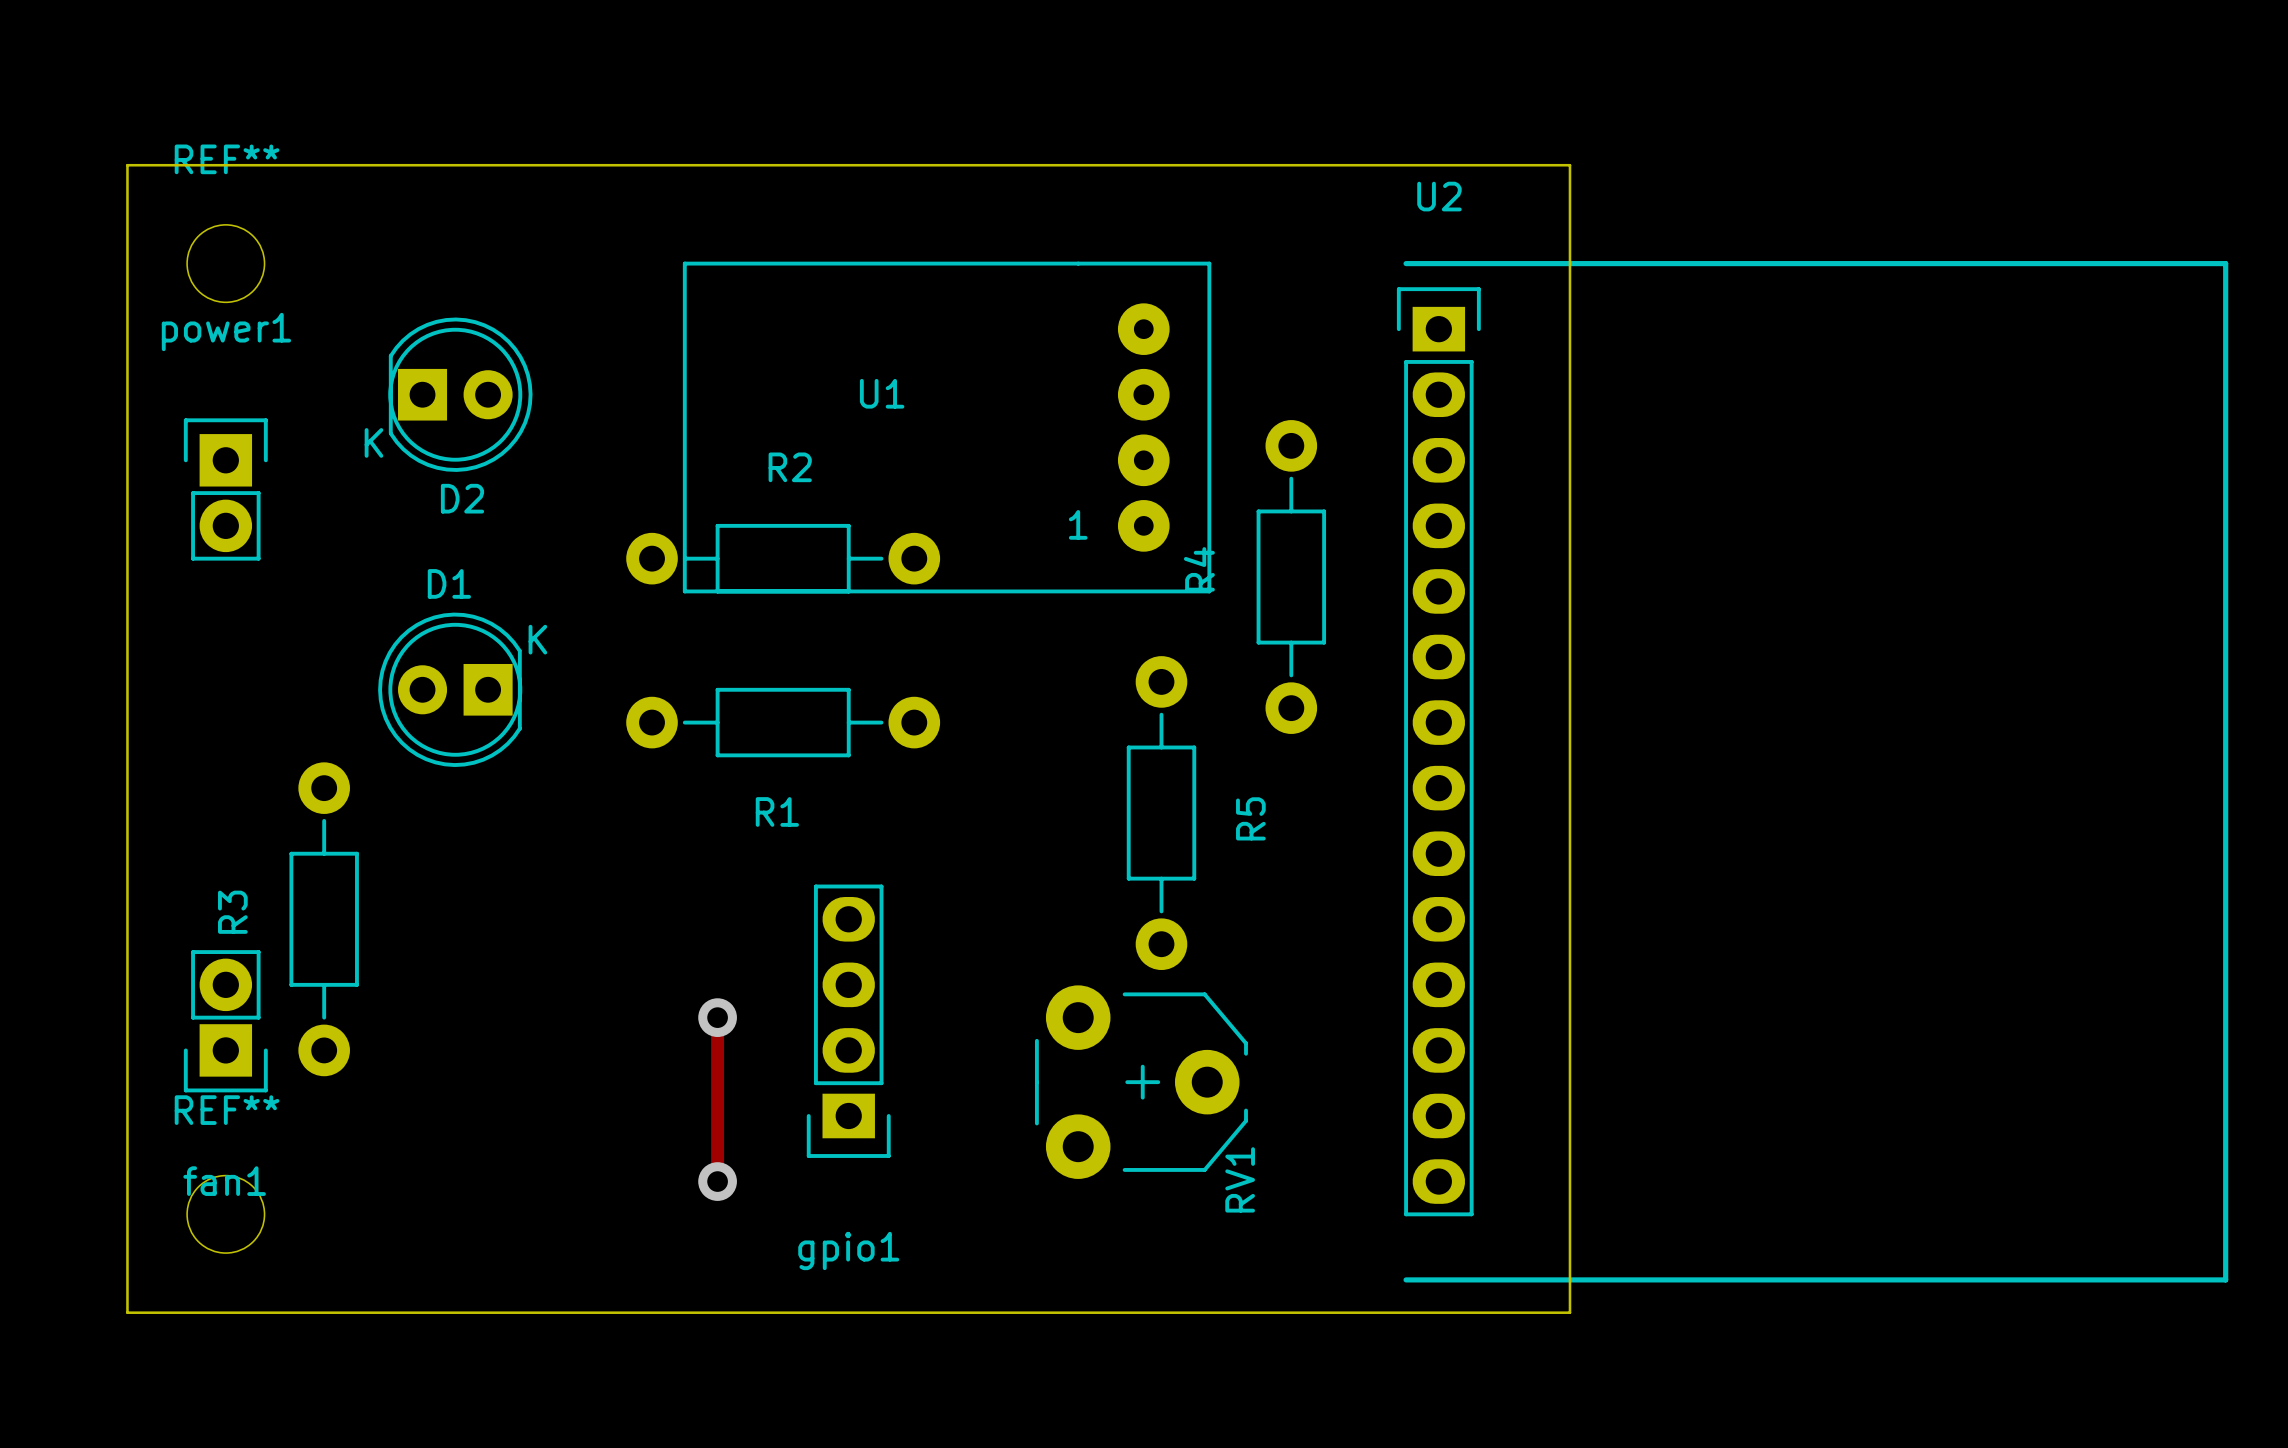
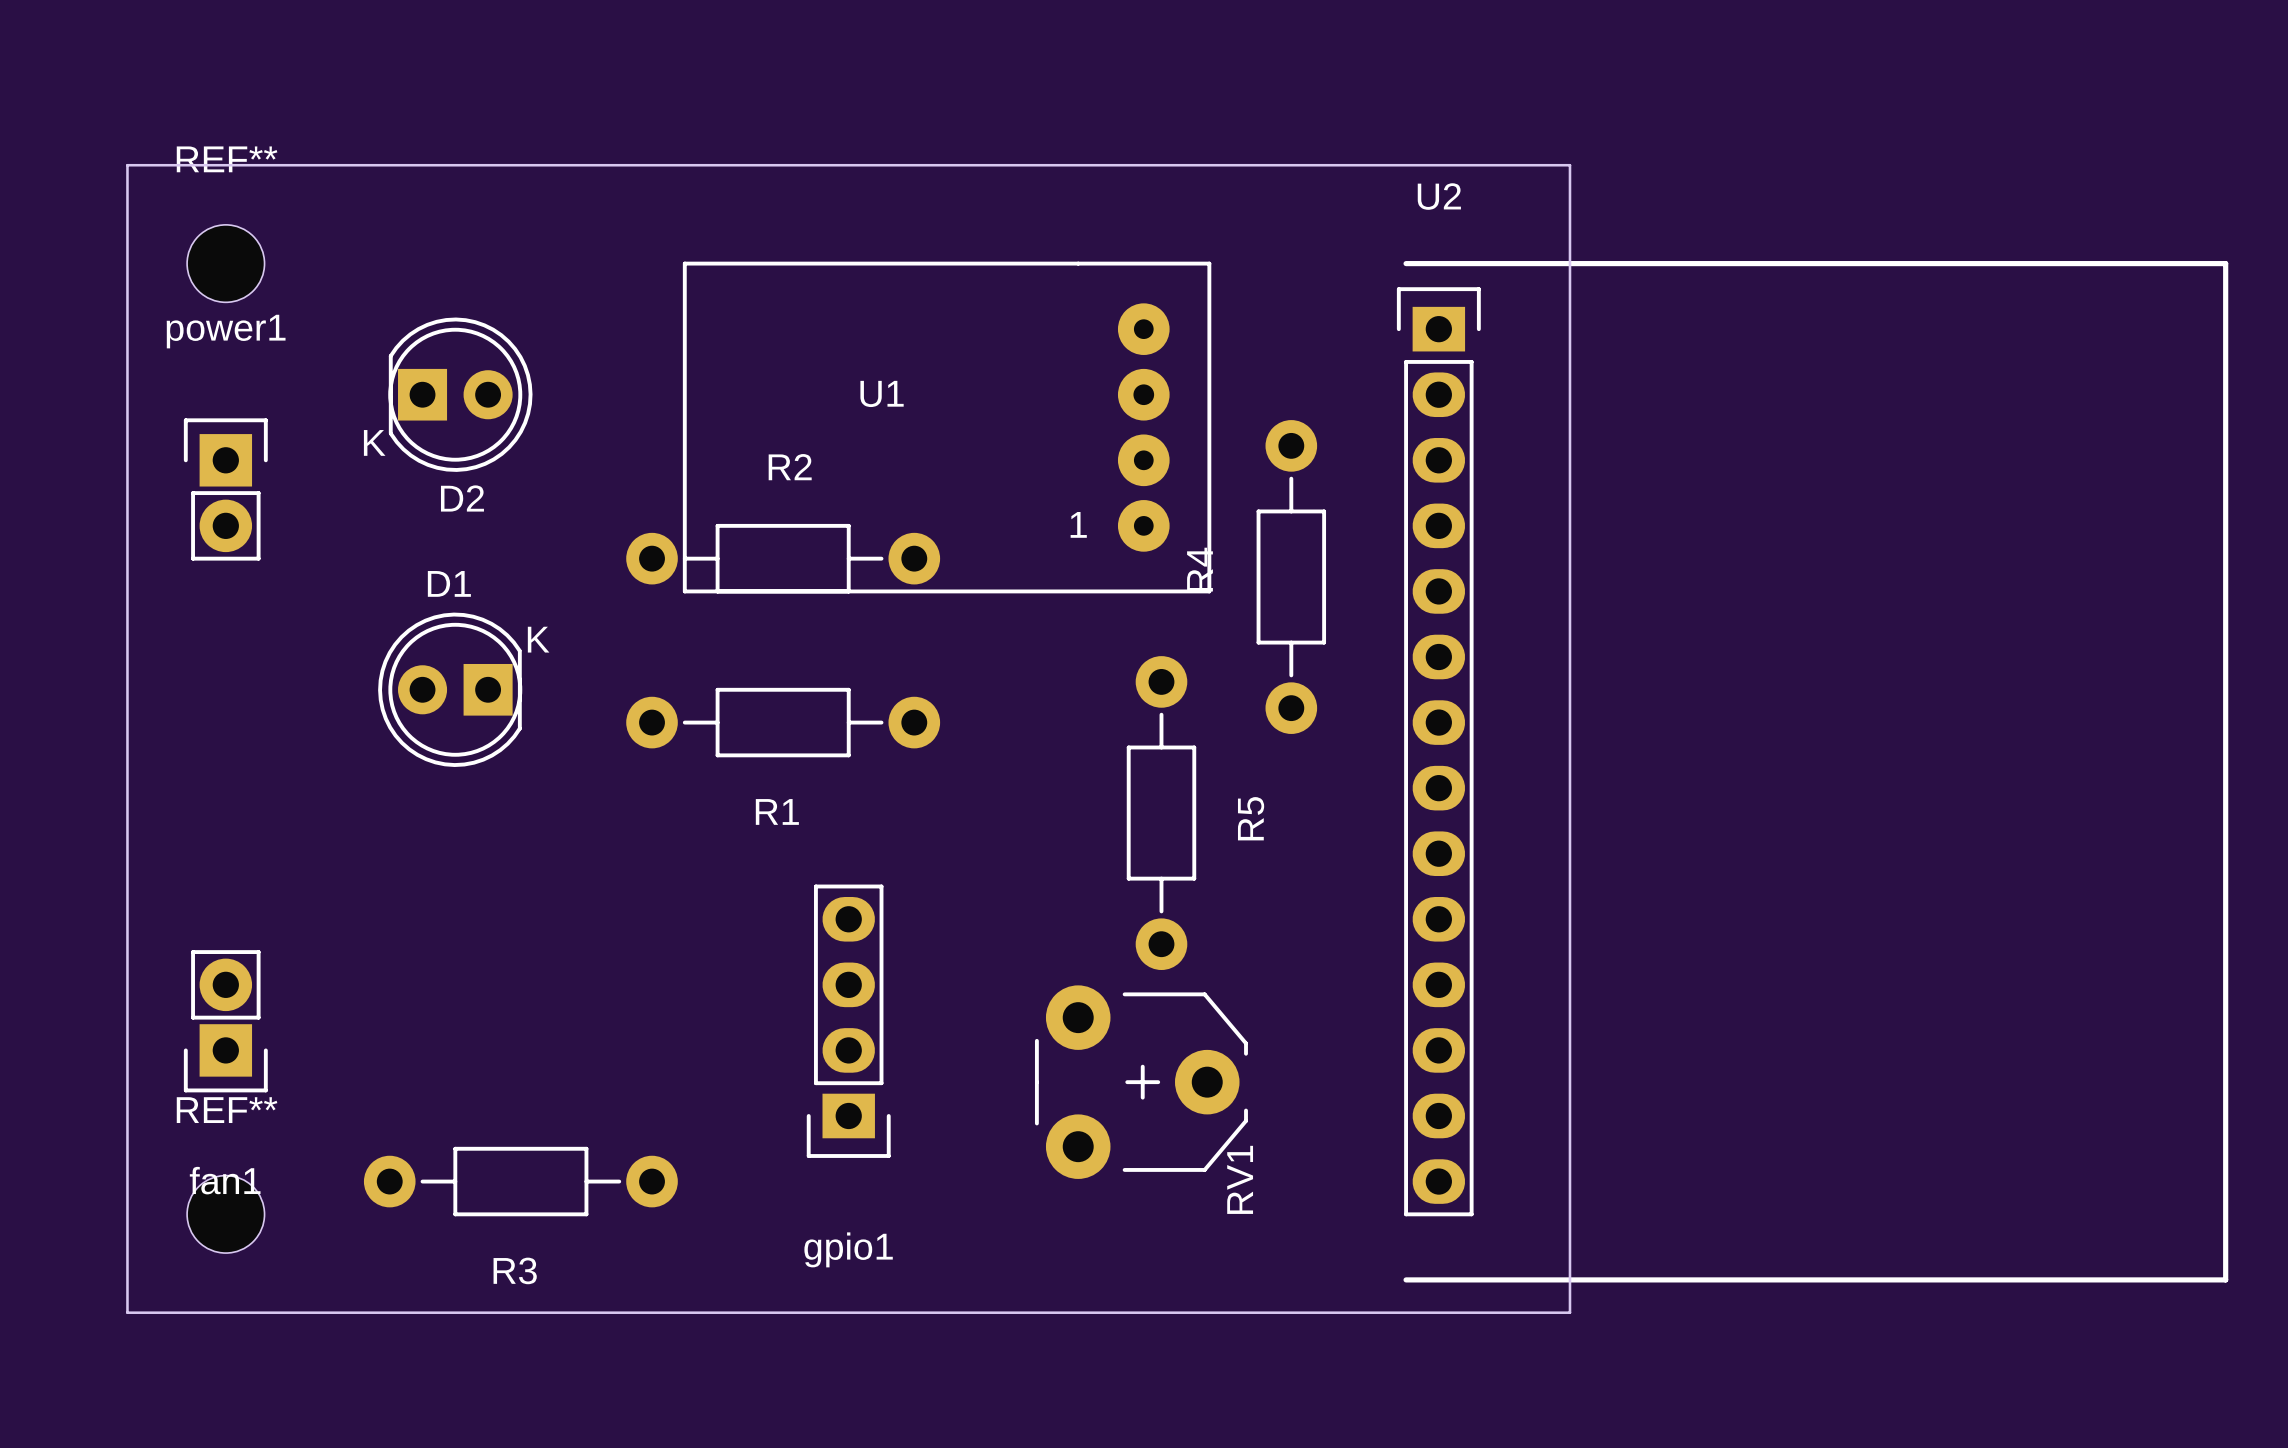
R3 name position: R3 (232, 912) -> R3 (515, 1270)
R3 rotation: 0° (324, 919) -> 90° clockwise (520, 1181)
R3 position: (324, 919) -> (520, 1181)
track: (717, 1017) (717, 1181) -> none
via: (717, 1017) -> none
via: (717, 1181) -> none

